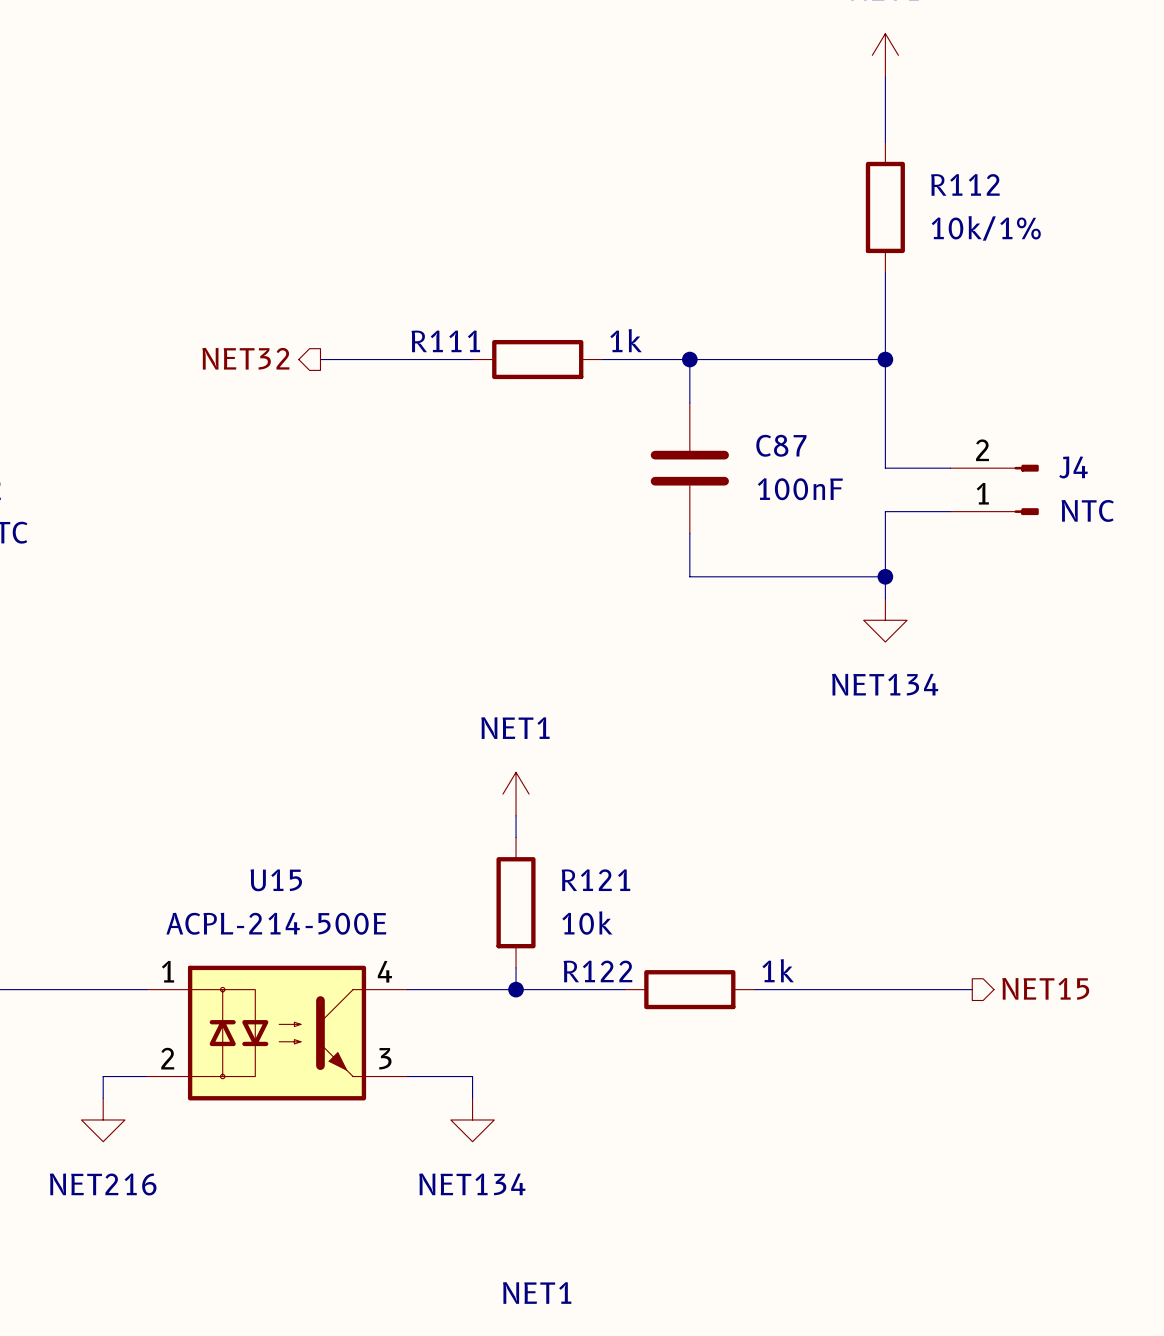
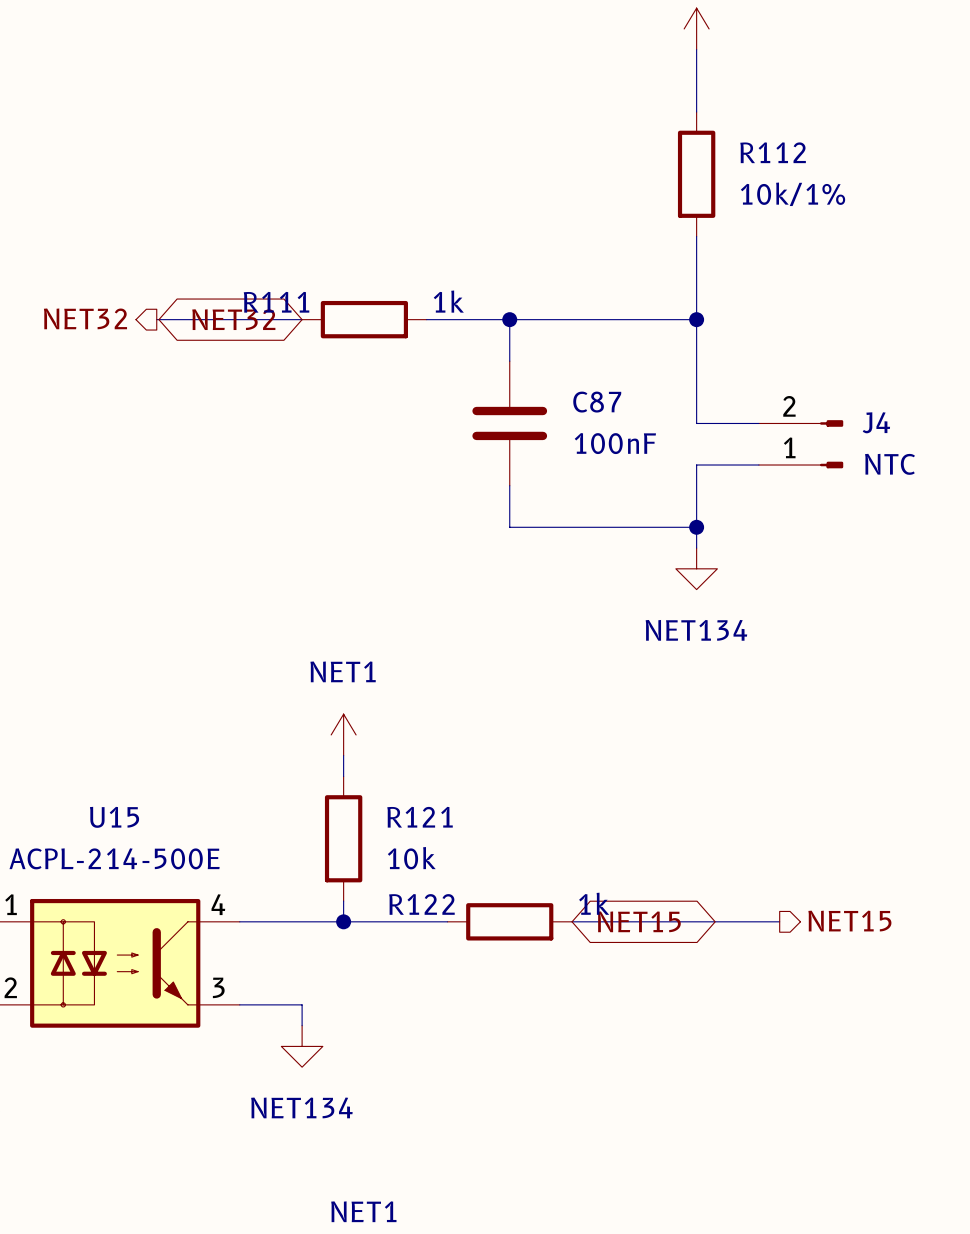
global label: none -> NET32 (233, 319)
global label: none -> NET15 (639, 921)

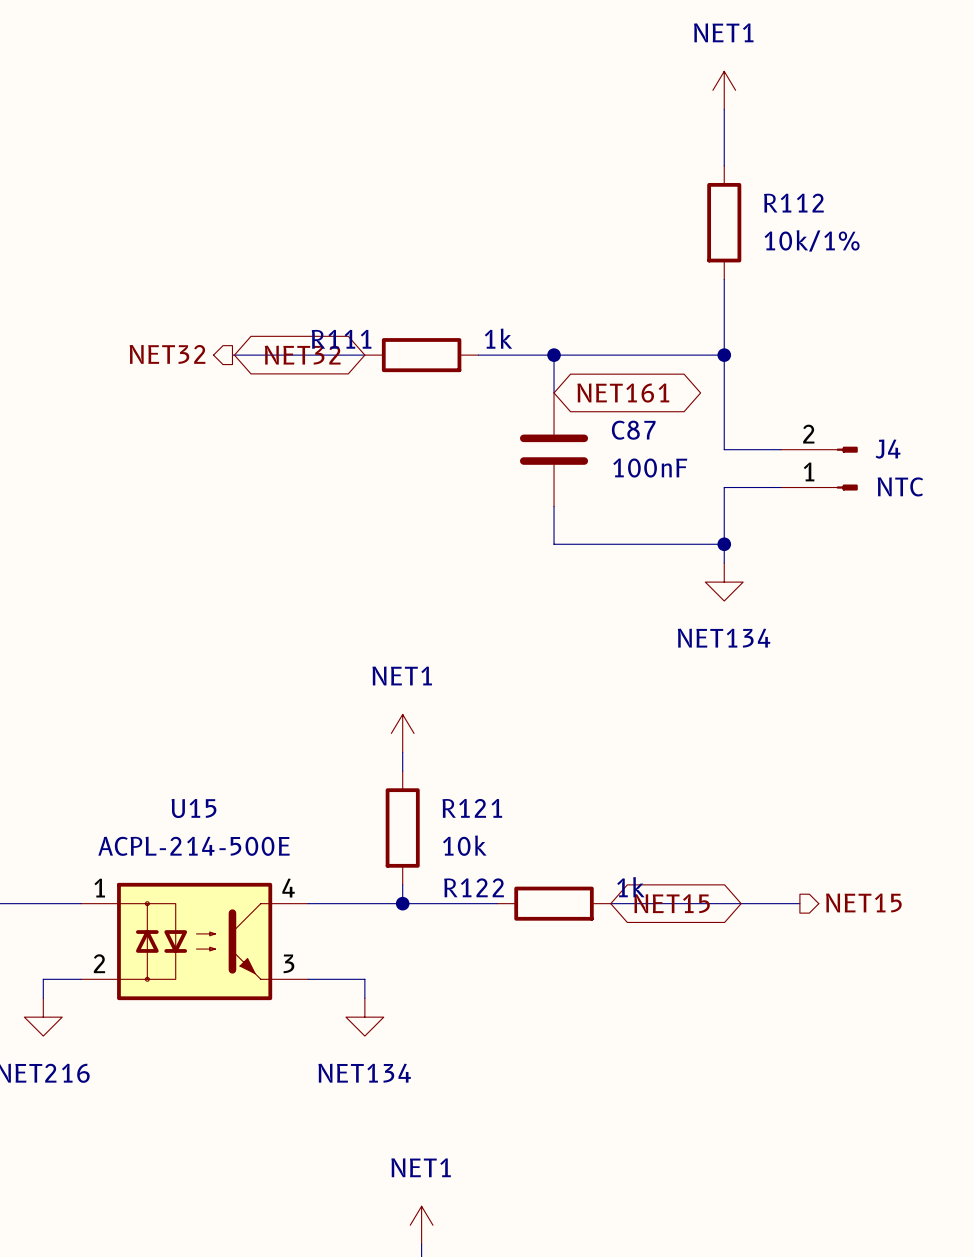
global label: none -> NET161 (623, 393)

